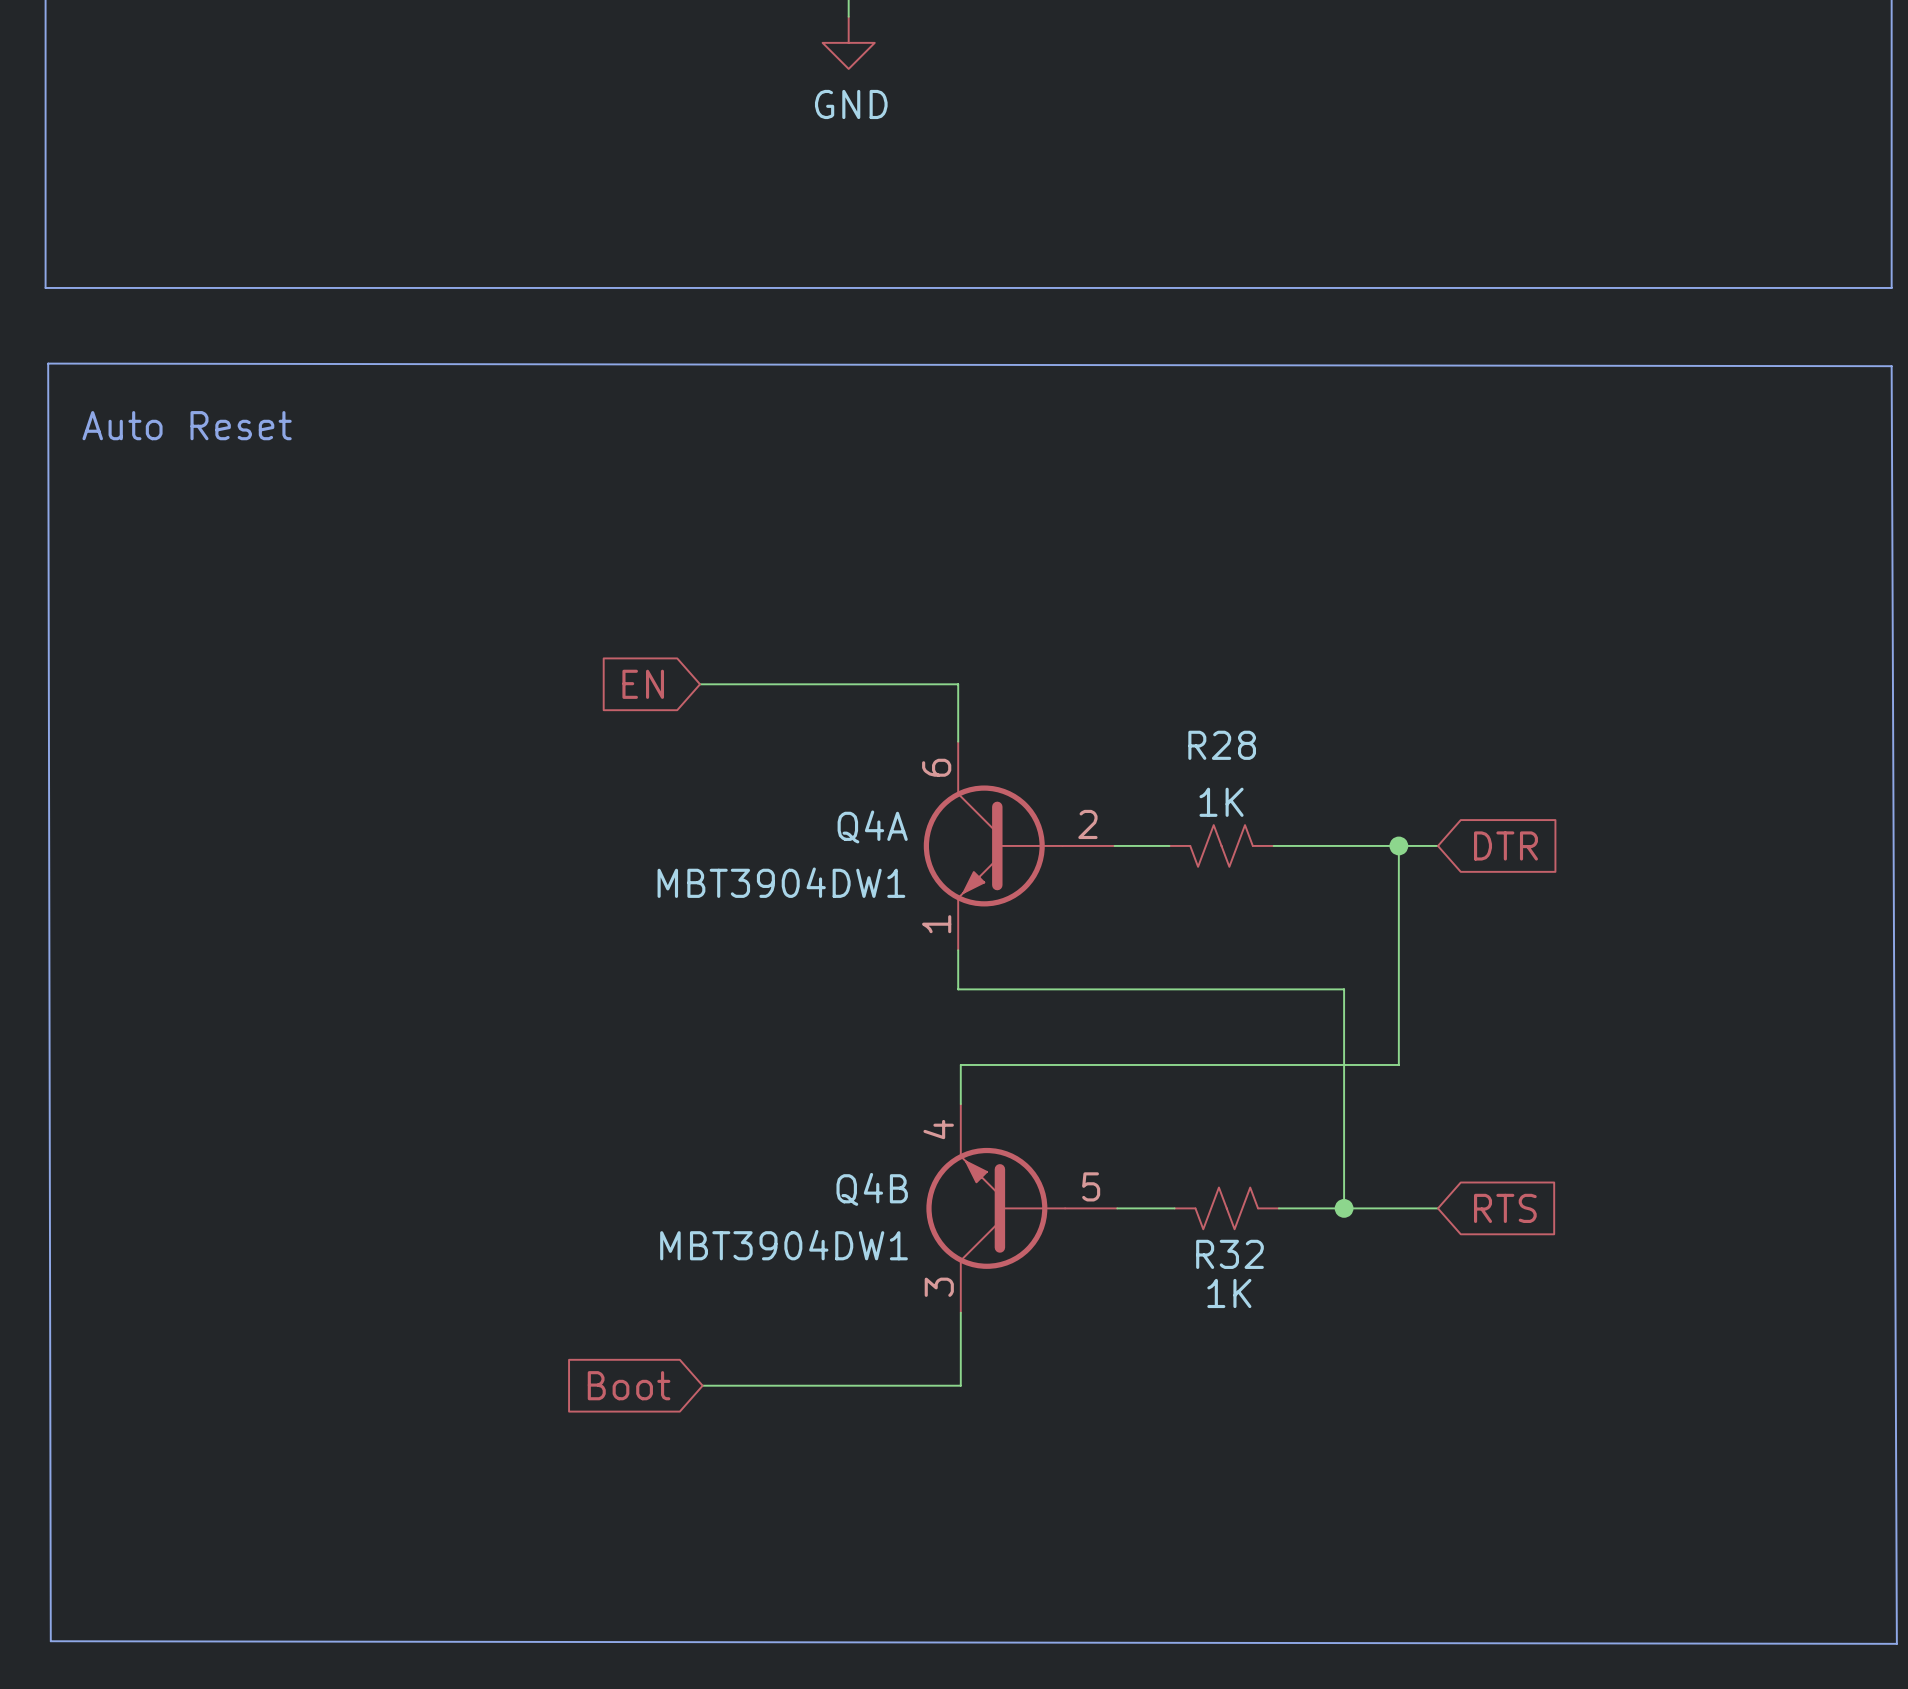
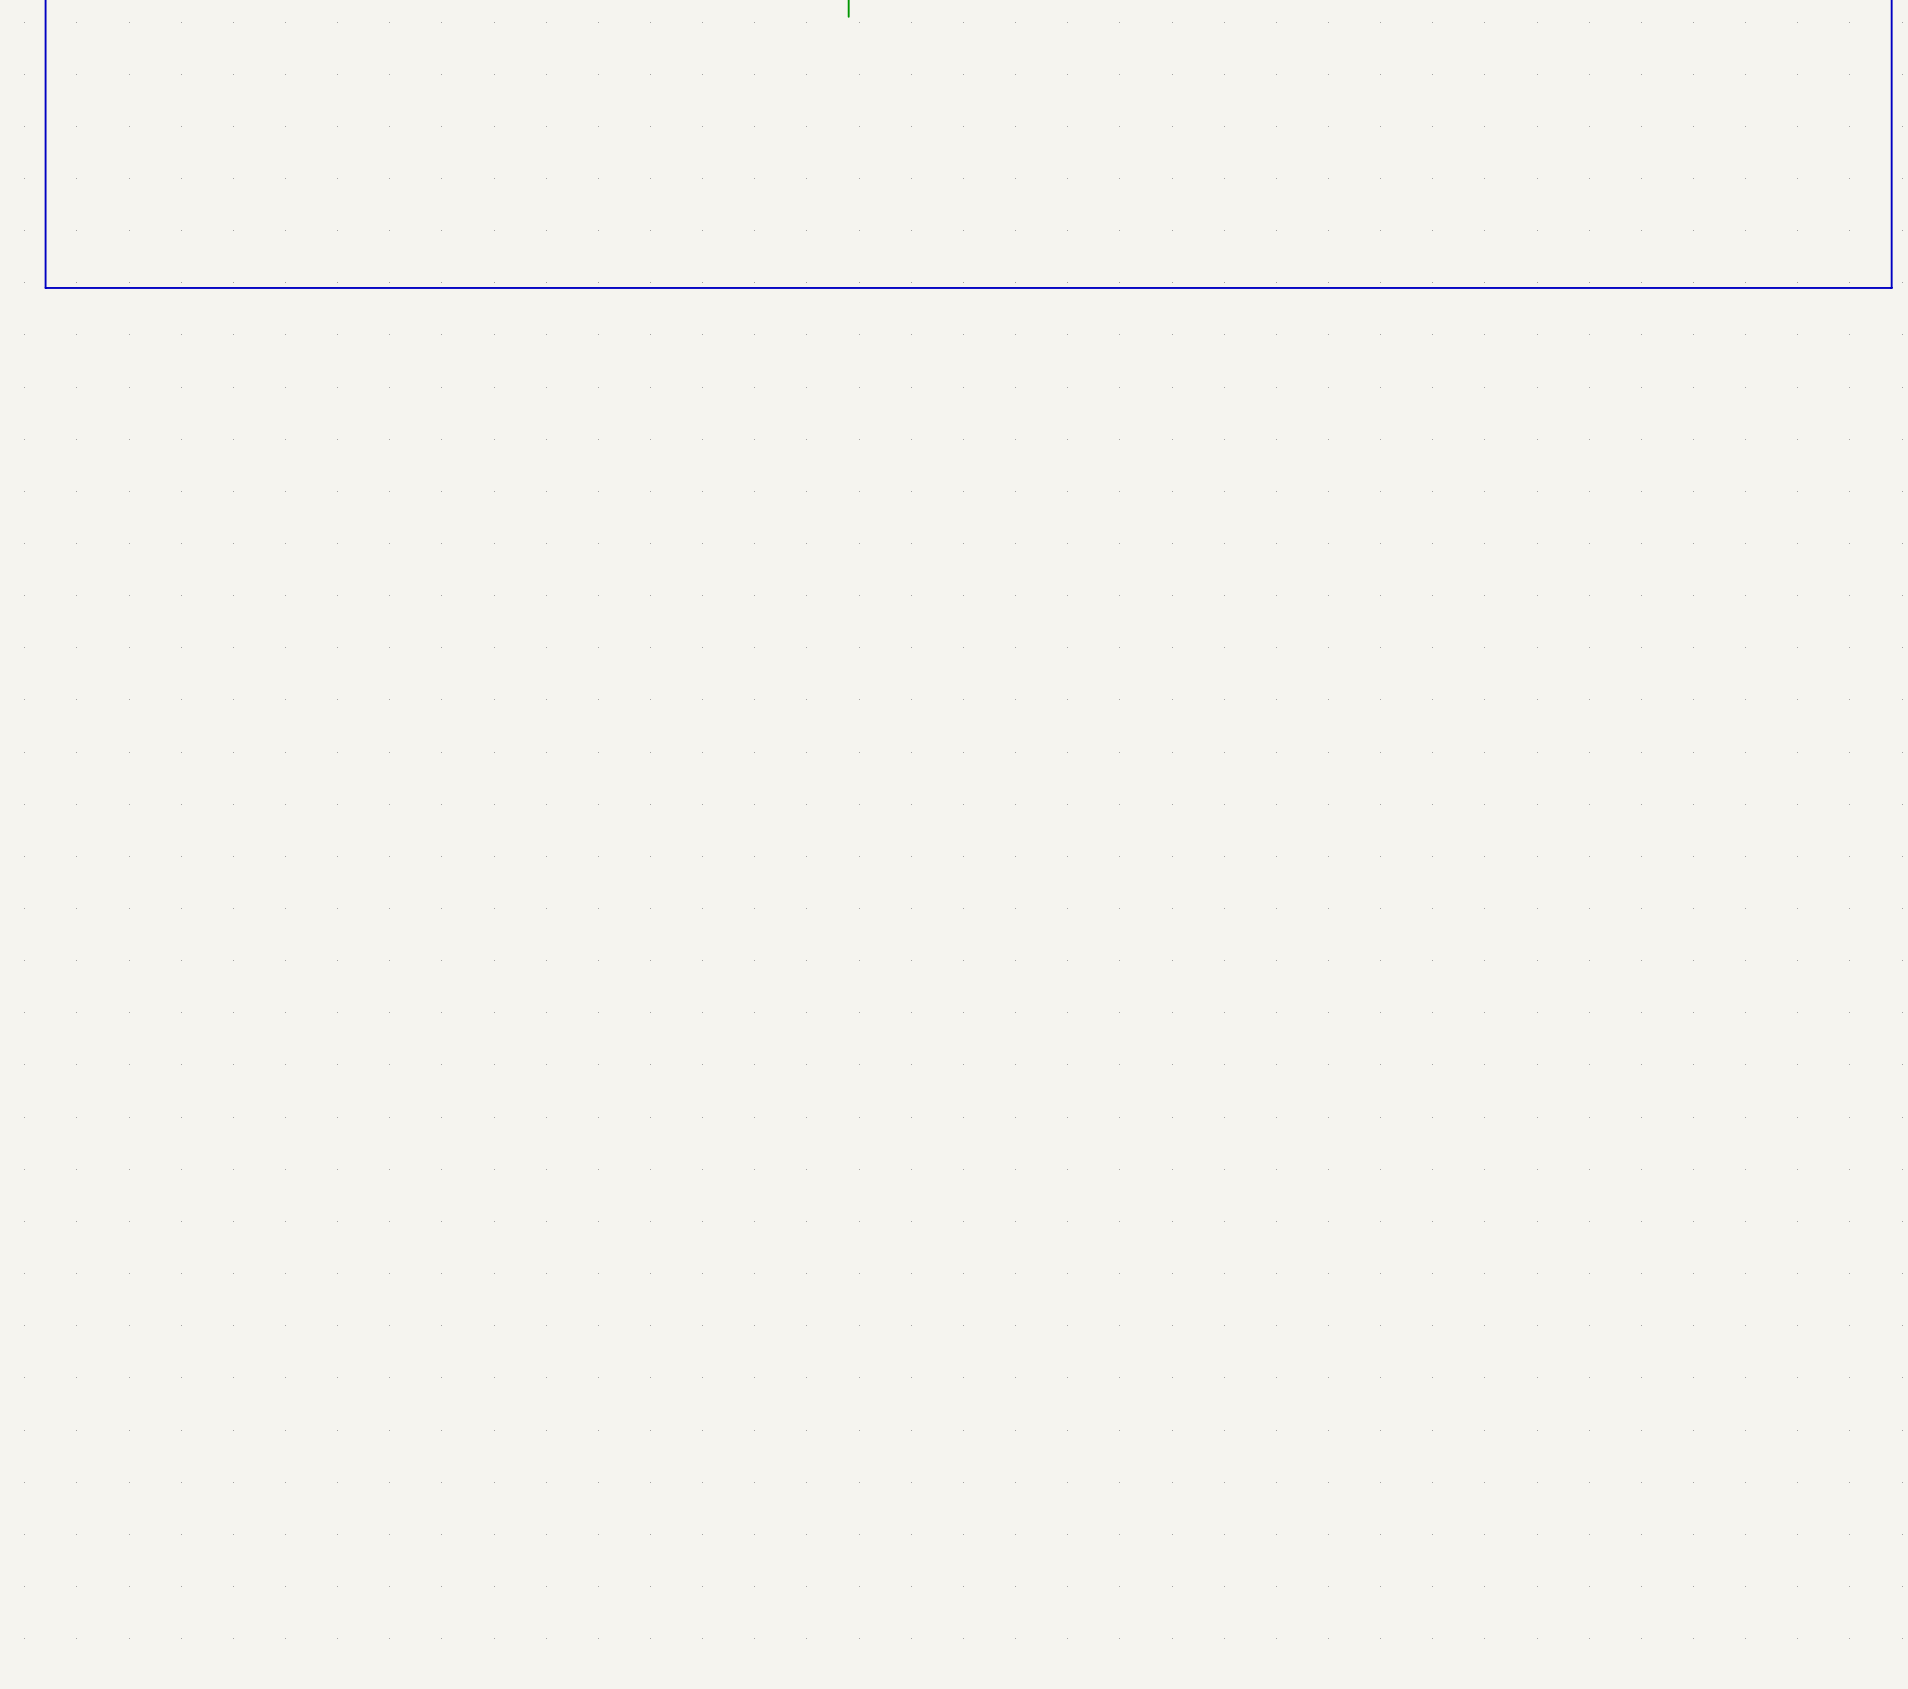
power symbol: GND (848, 42) -> none
line: (48, 363) (1891, 366) (1896, 1643) (50, 1641) (48, 363) -> none
text: Auto Reset (187, 425) -> none
global label: EN (643, 684) -> none
wire: (700, 684) (958, 684) (958, 741) -> none
Q4A: MBT3904DW1 (1019, 845) -> none
wire: (1114, 845) (1169, 845) -> none
R28: 1K (1221, 845) -> none
wire: (1273, 845) (1437, 845) -> none
wire: (1398, 845) (1398, 1064) (960, 1064) (960, 1104) -> none
junction: (1398, 845) -> none
global label: DTR (1505, 845) -> none
wire: (958, 950) (958, 989) (1344, 989) (1344, 1208) -> none
Q4B: MBT3904DW1 (1021, 1208) -> none
wire: (1117, 1208) (1174, 1208) -> none
R32: 1K (1226, 1208) -> none
wire: (1278, 1208) (1437, 1208) -> none
junction: (1344, 1208) -> none
global label: RTS (1505, 1208) -> none
wire: (960, 1312) (960, 1385) (702, 1385) -> none
global label: Boot (629, 1385) -> none

